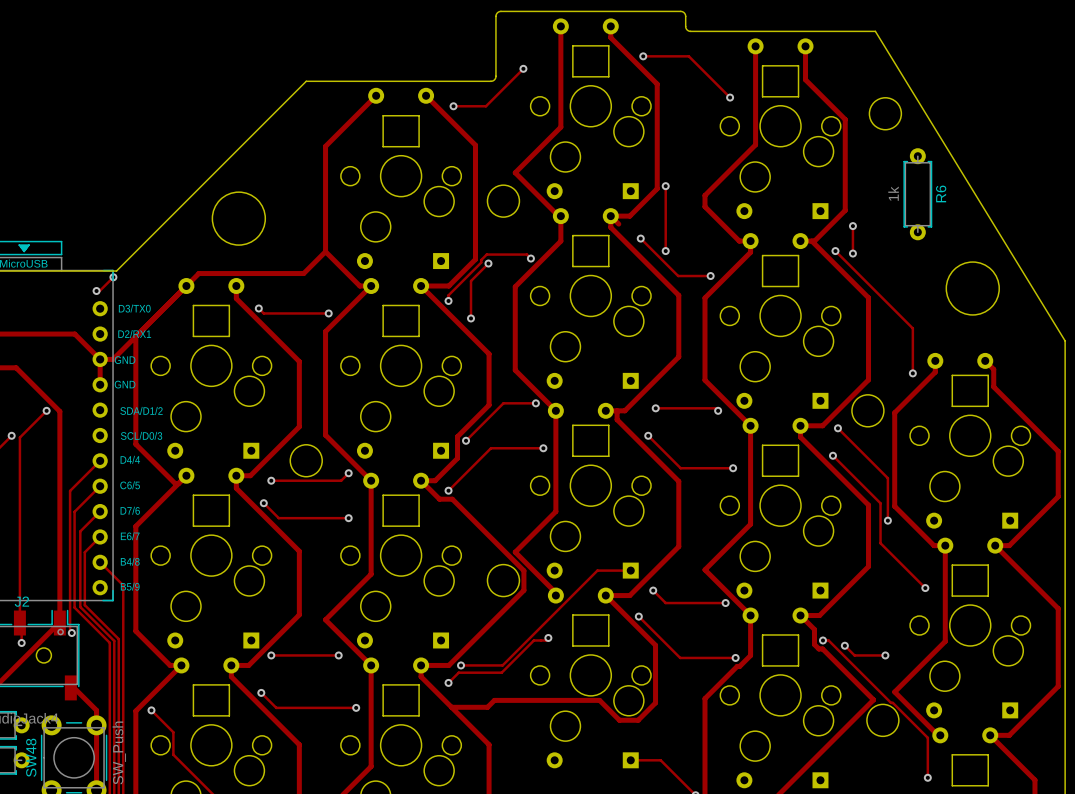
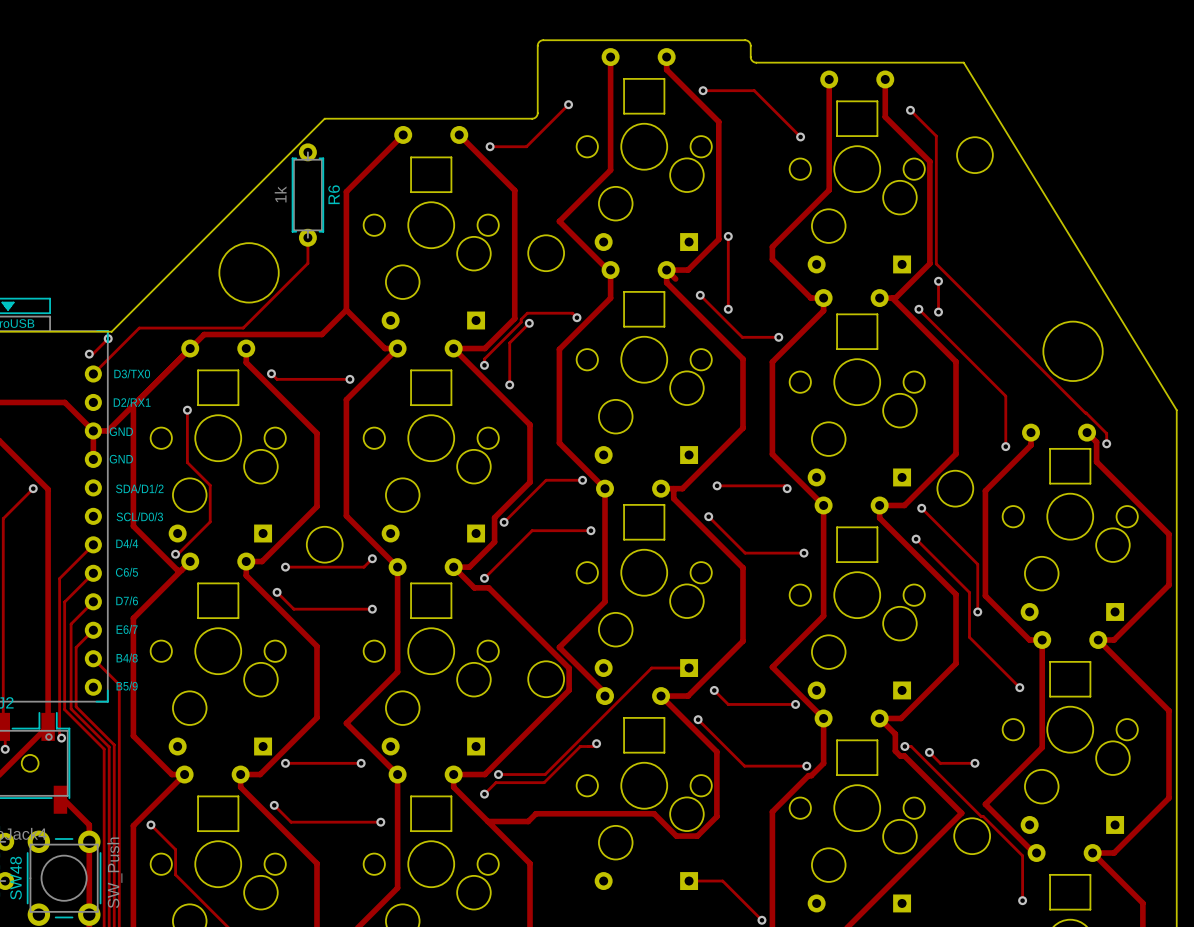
track: none -> (910, 110) (936, 136) (936, 263) (1106, 433) (1106, 443)
via: none -> (910, 110)
track: none -> (307, 237) (307, 263) (243, 328) (139, 328) (93, 373)
R6 position: (917, 194) -> (307, 195)
track: none -> (187, 410) (187, 462) (210, 485) (210, 521) (177, 554) (175, 554)
via: none -> (187, 410)
via: none -> (1106, 443)
via: none -> (175, 554)

